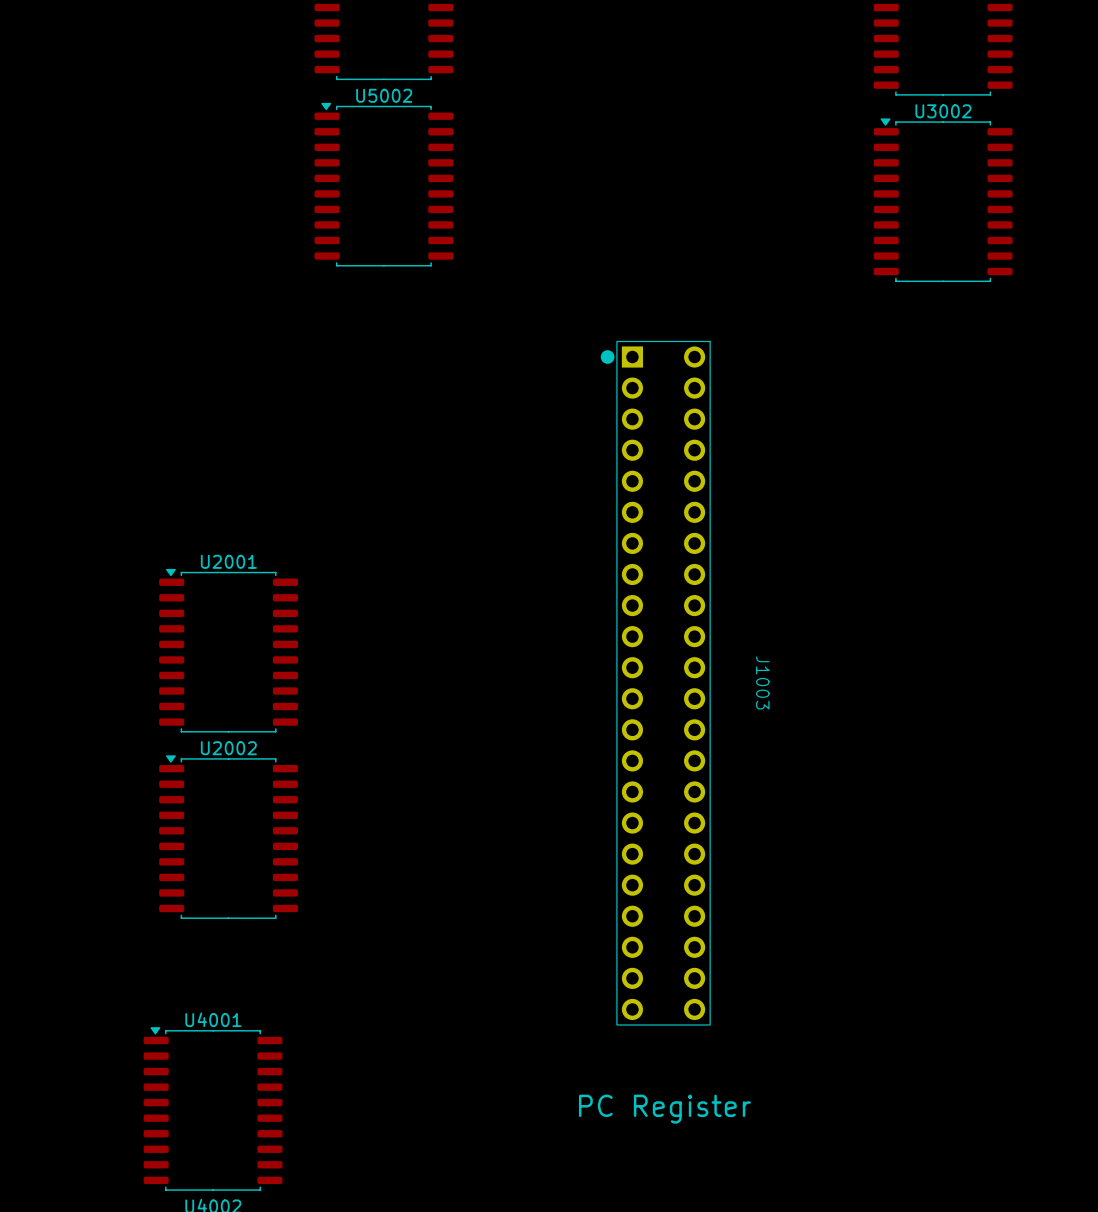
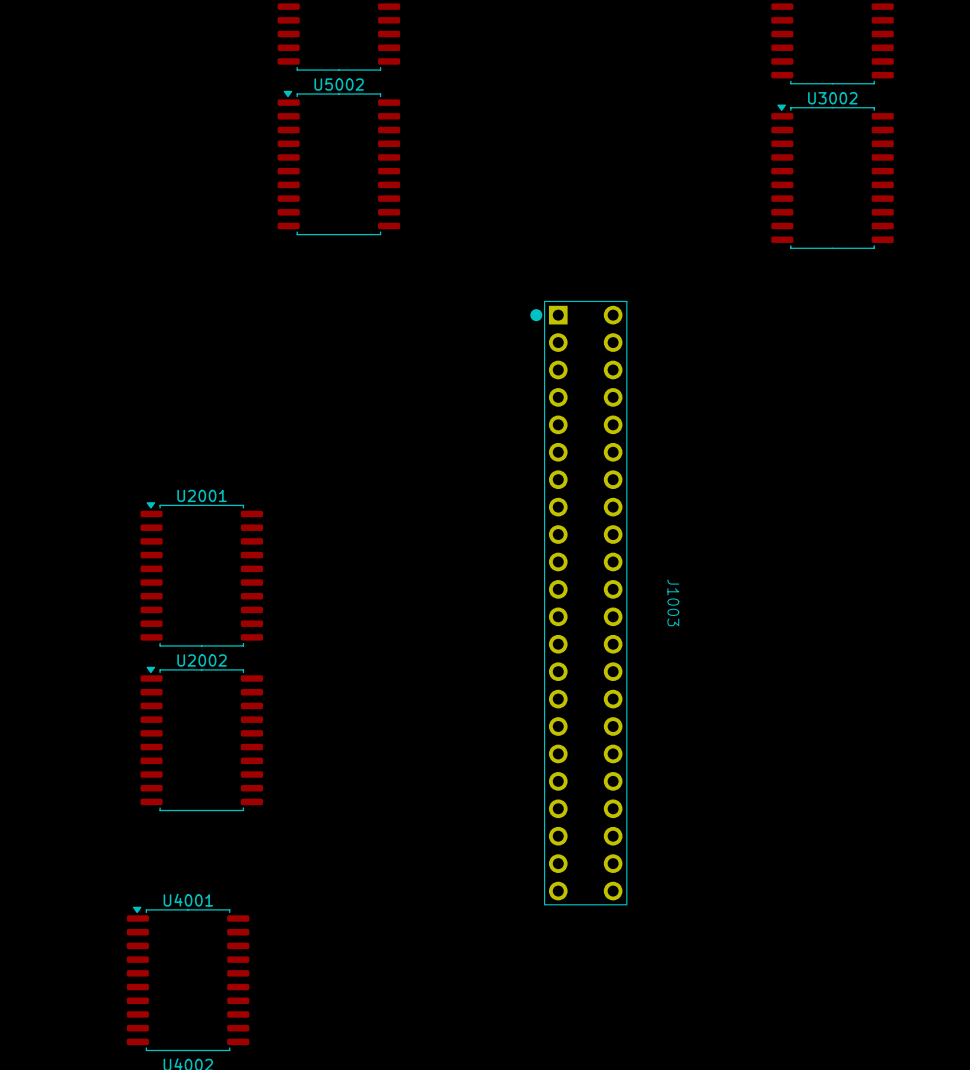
text: PC Register (664, 1109) -> none

